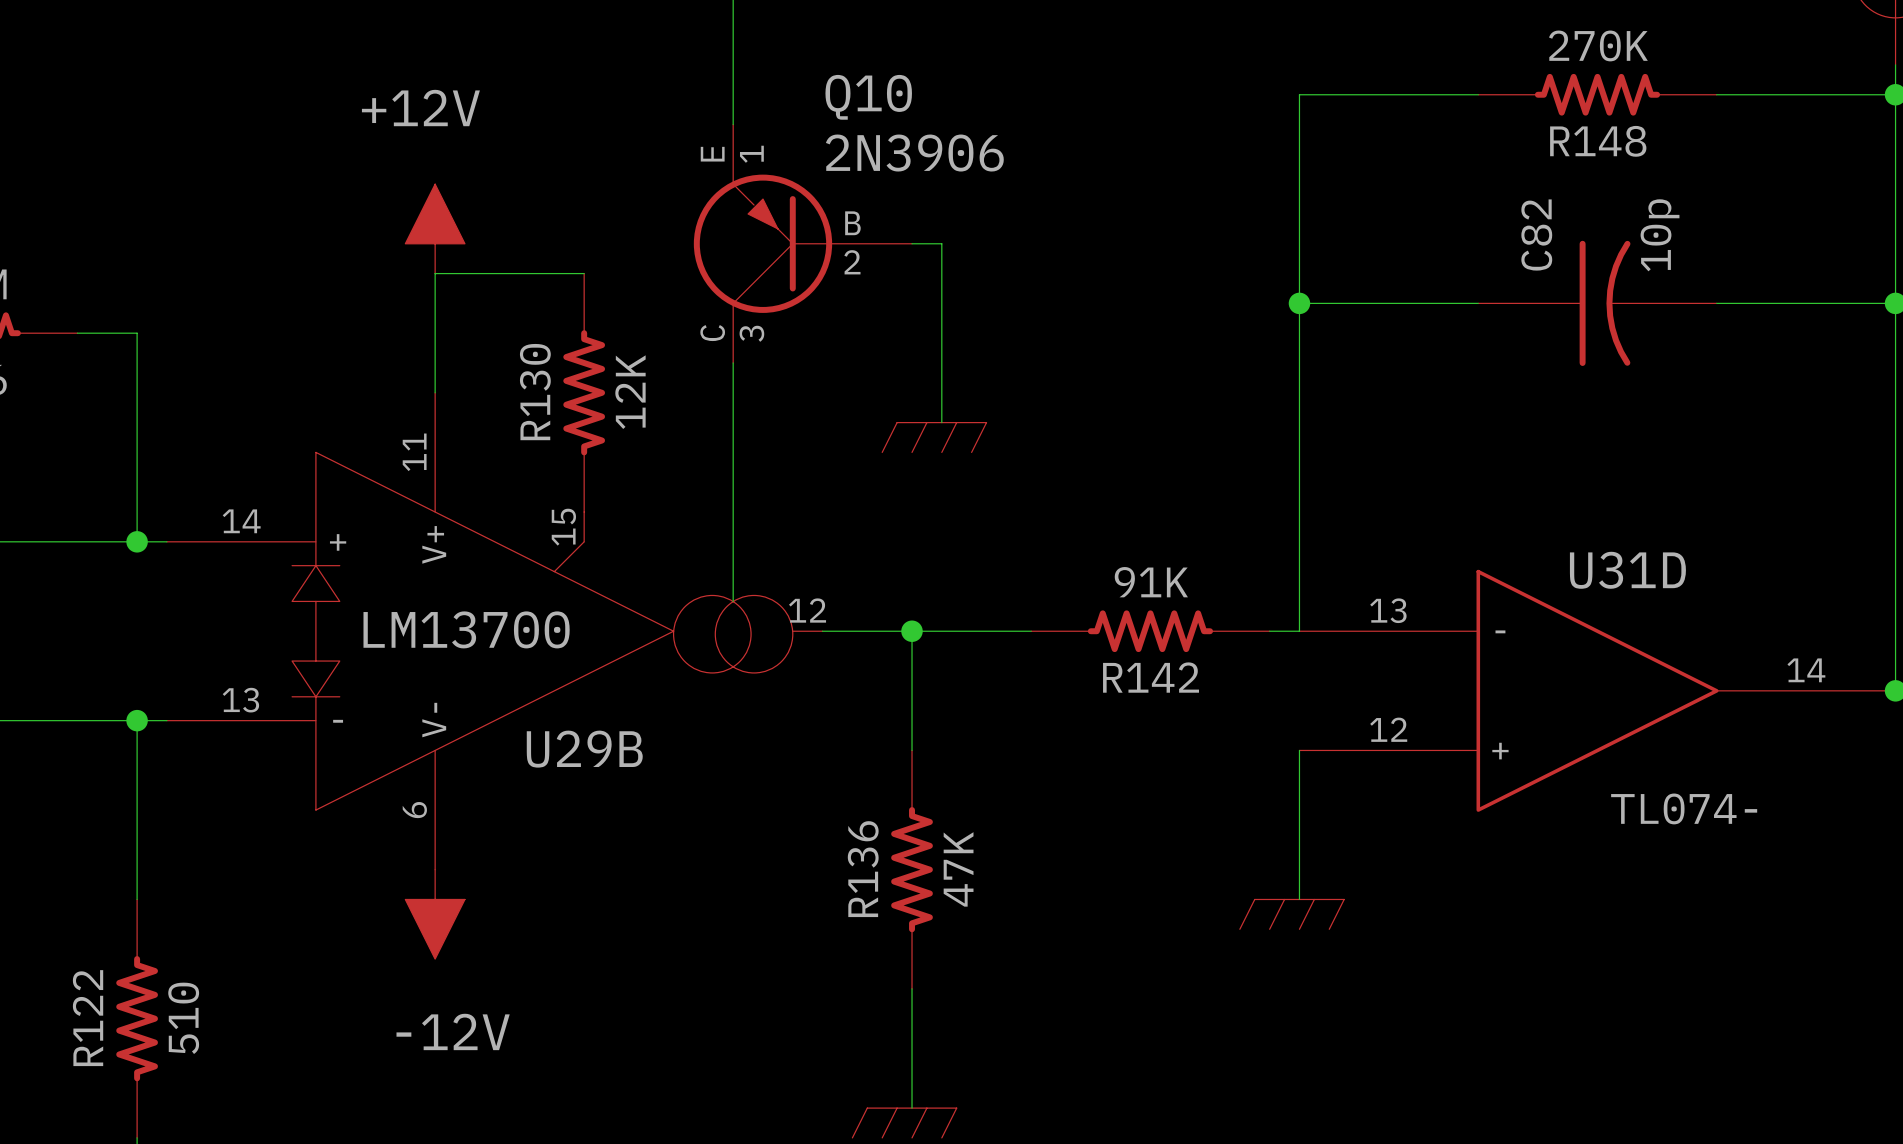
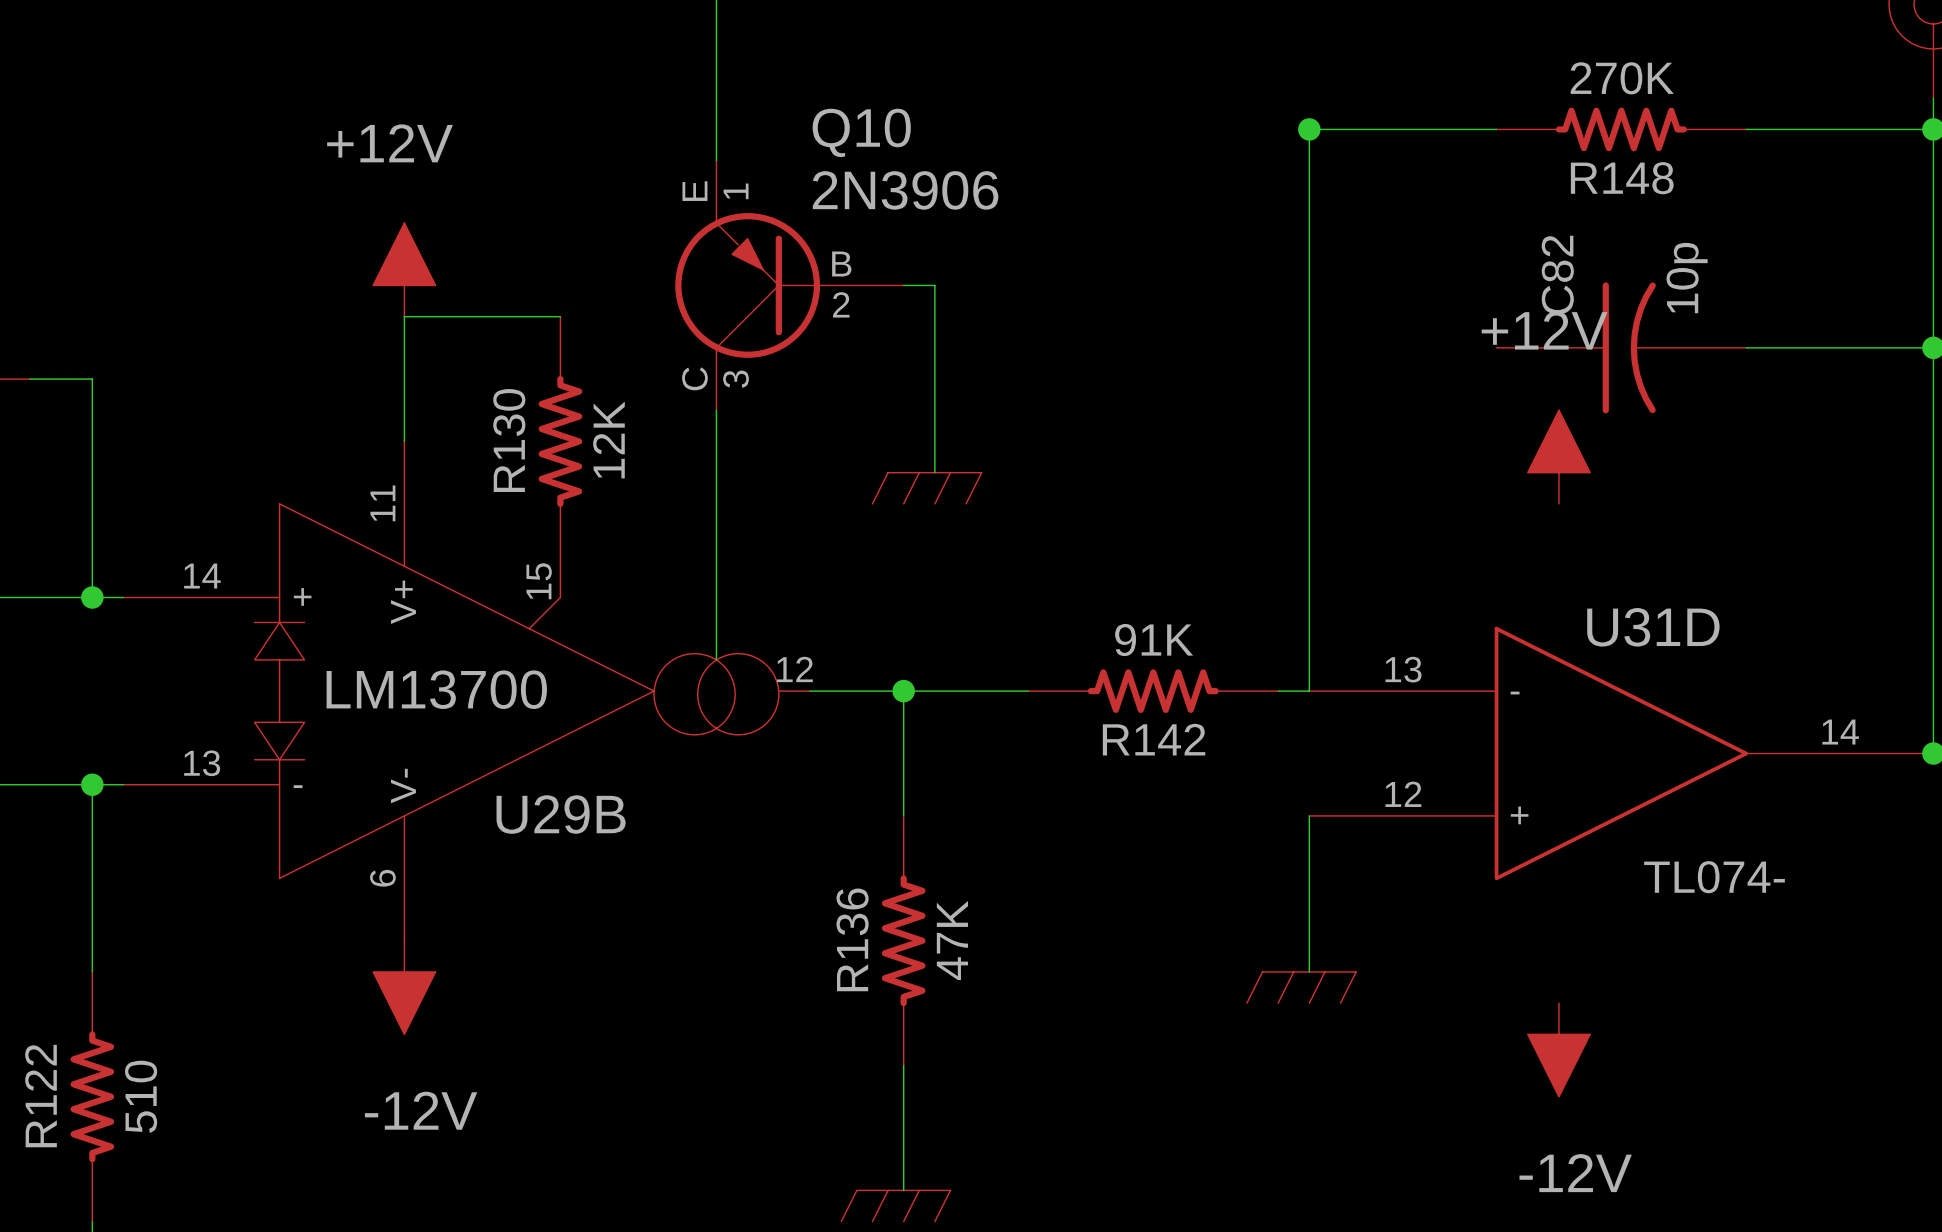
junction: none -> (1309, 129)
wire: (1299, 303) (1478, 303) -> none
junction: (1299, 303) -> none
power symbol: none -> +12V (1558, 457)
power symbol: none -> -12V (1558, 1049)

